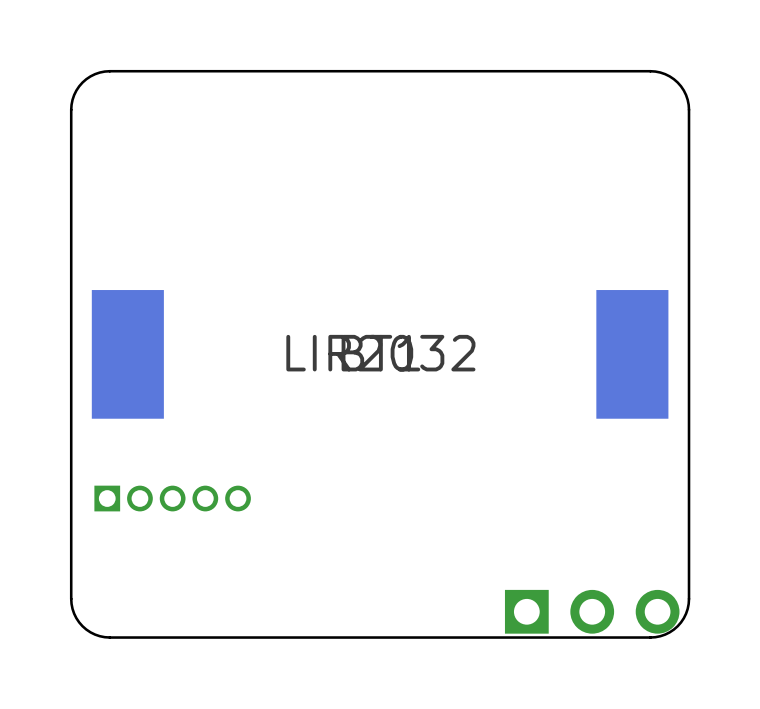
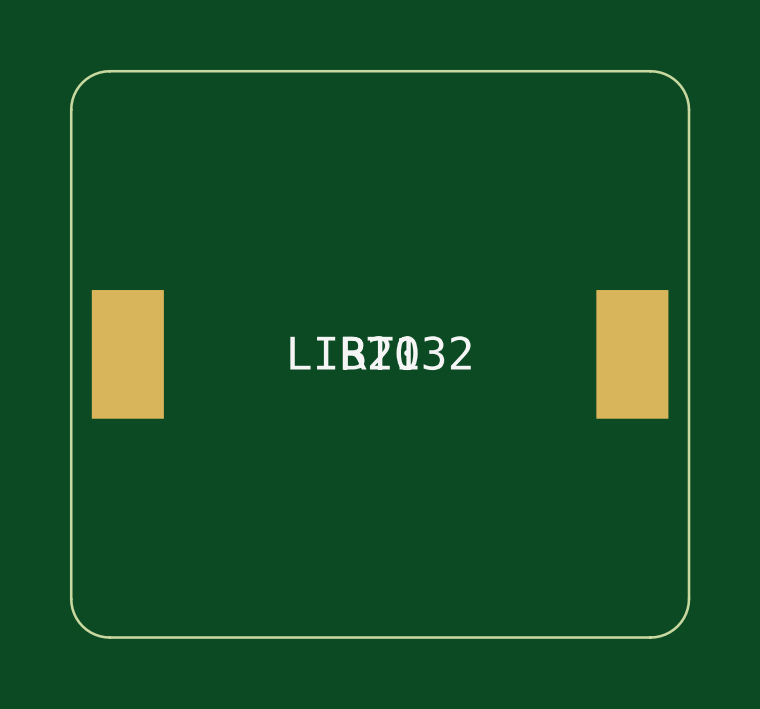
part: (172, 498) -> none
part: (592, 611) -> none

